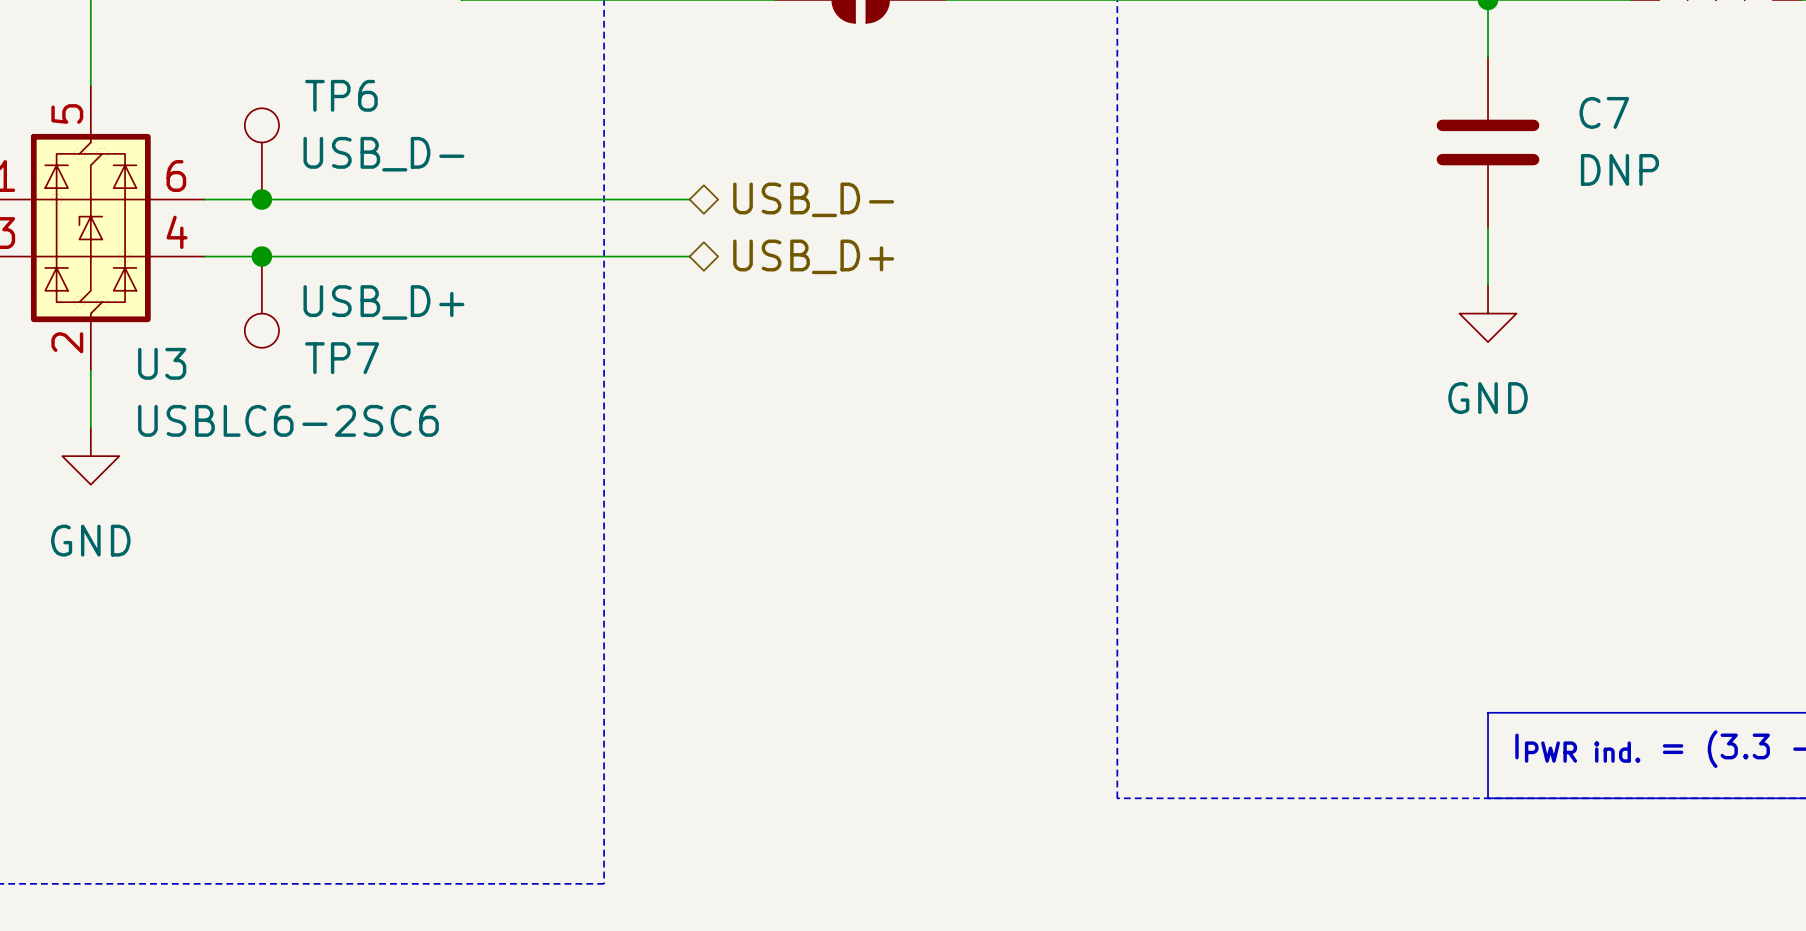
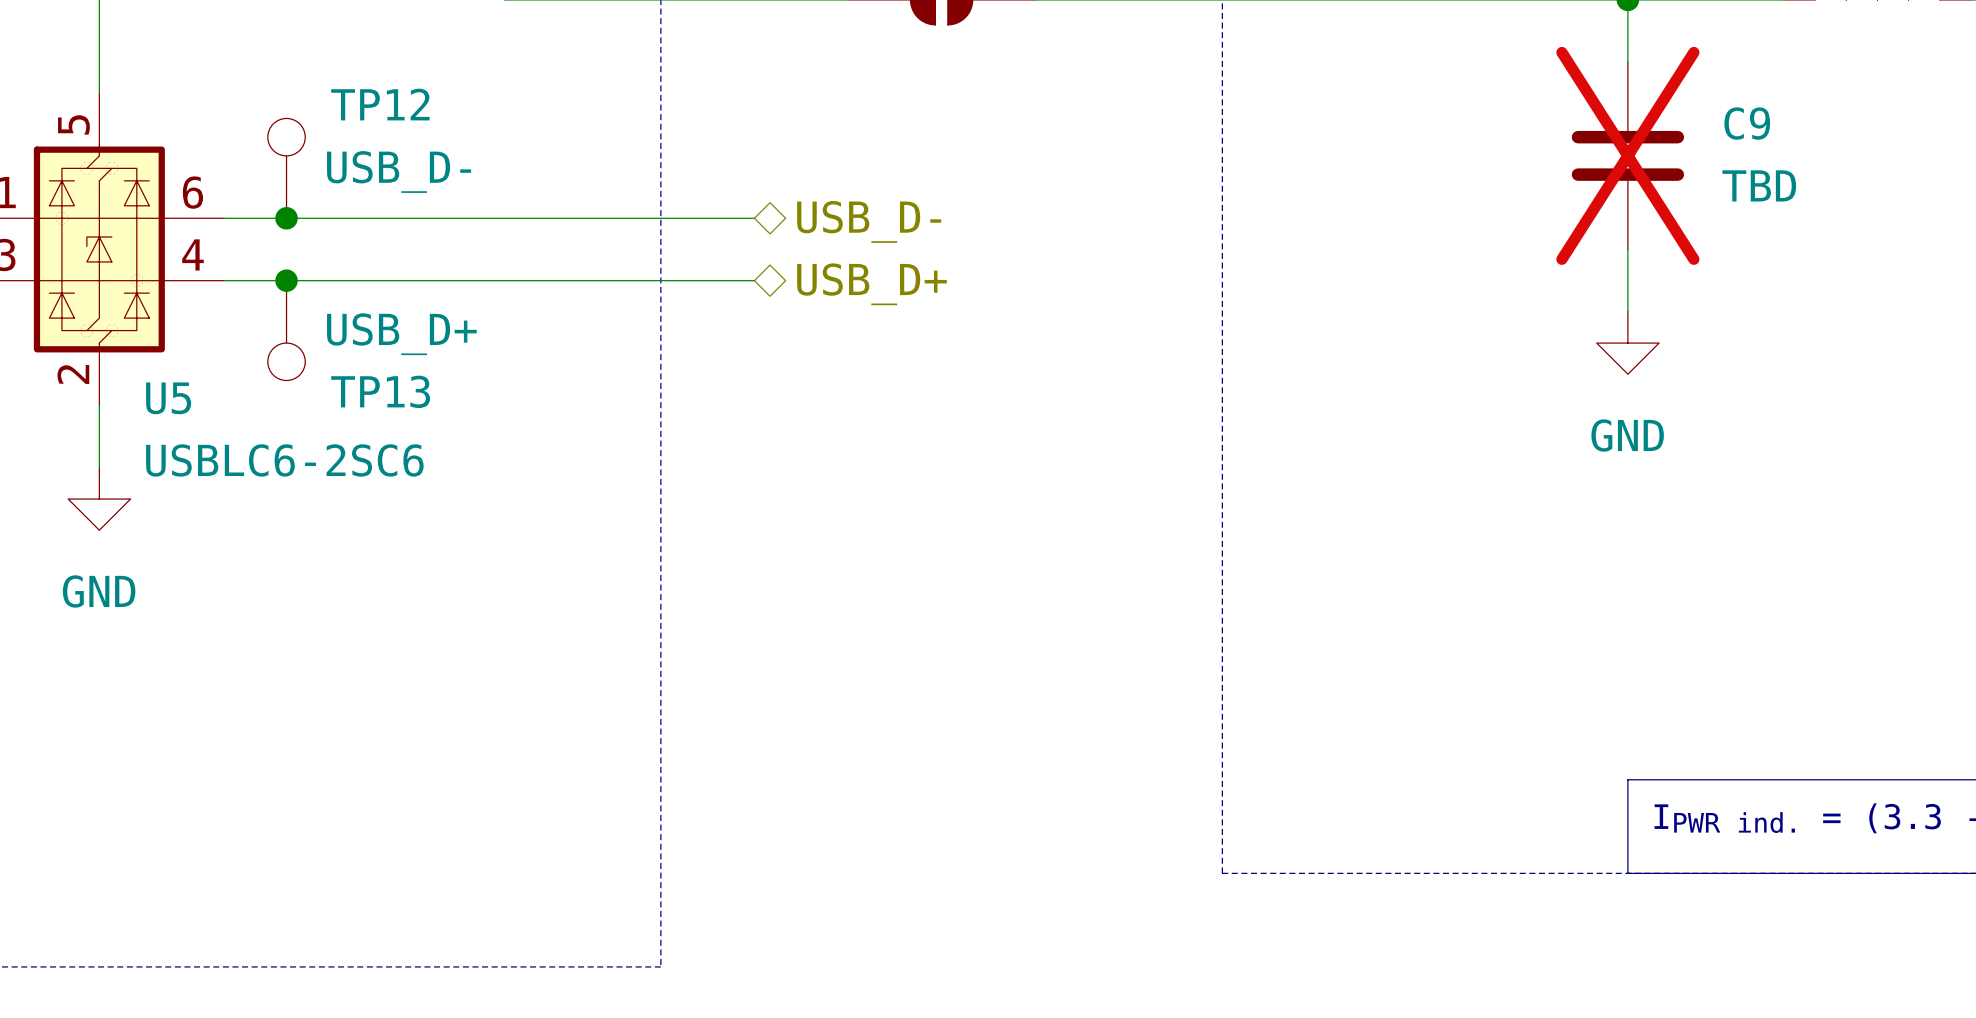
TP6 name: TP6 (341, 95) -> TP12 (380, 104)
C7 name: C7 (1604, 112) -> C9 (1747, 123)
C7 do-not-place cross: none -> (1627, 155)
C7 value: DNP (1619, 169) -> TBD (1759, 185)
TP7 name: TP7 (342, 358) -> TP13 (380, 391)
U3 name: U3 (162, 363) -> U5 (168, 398)

